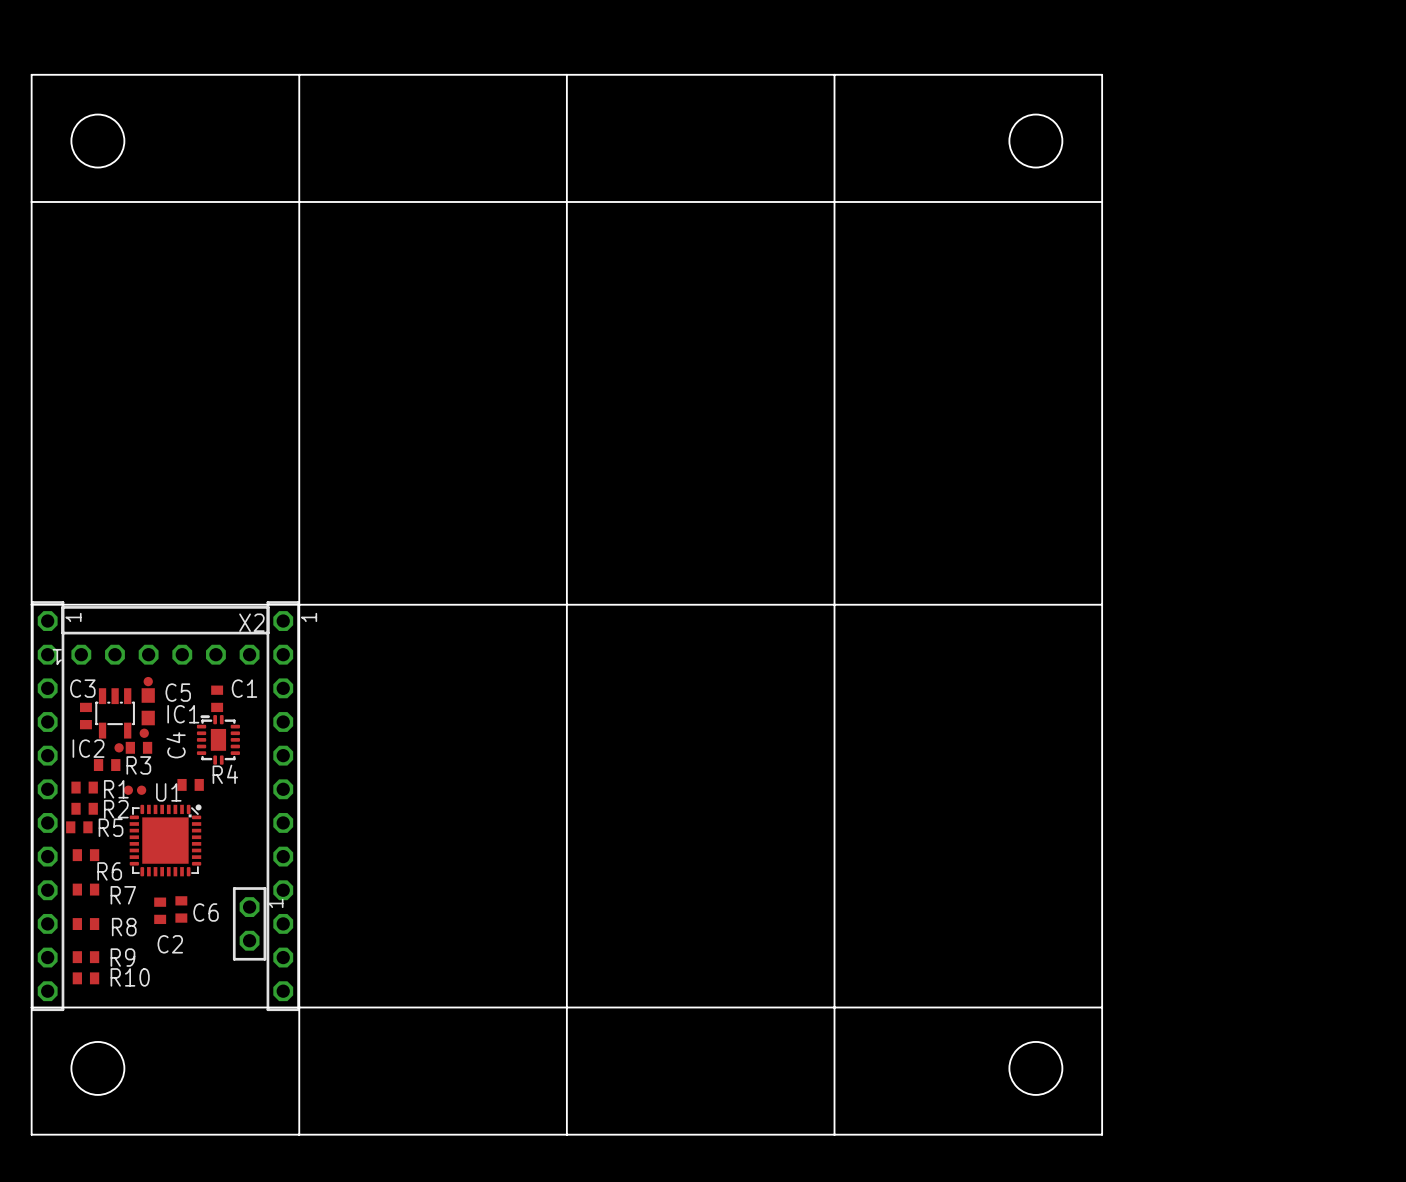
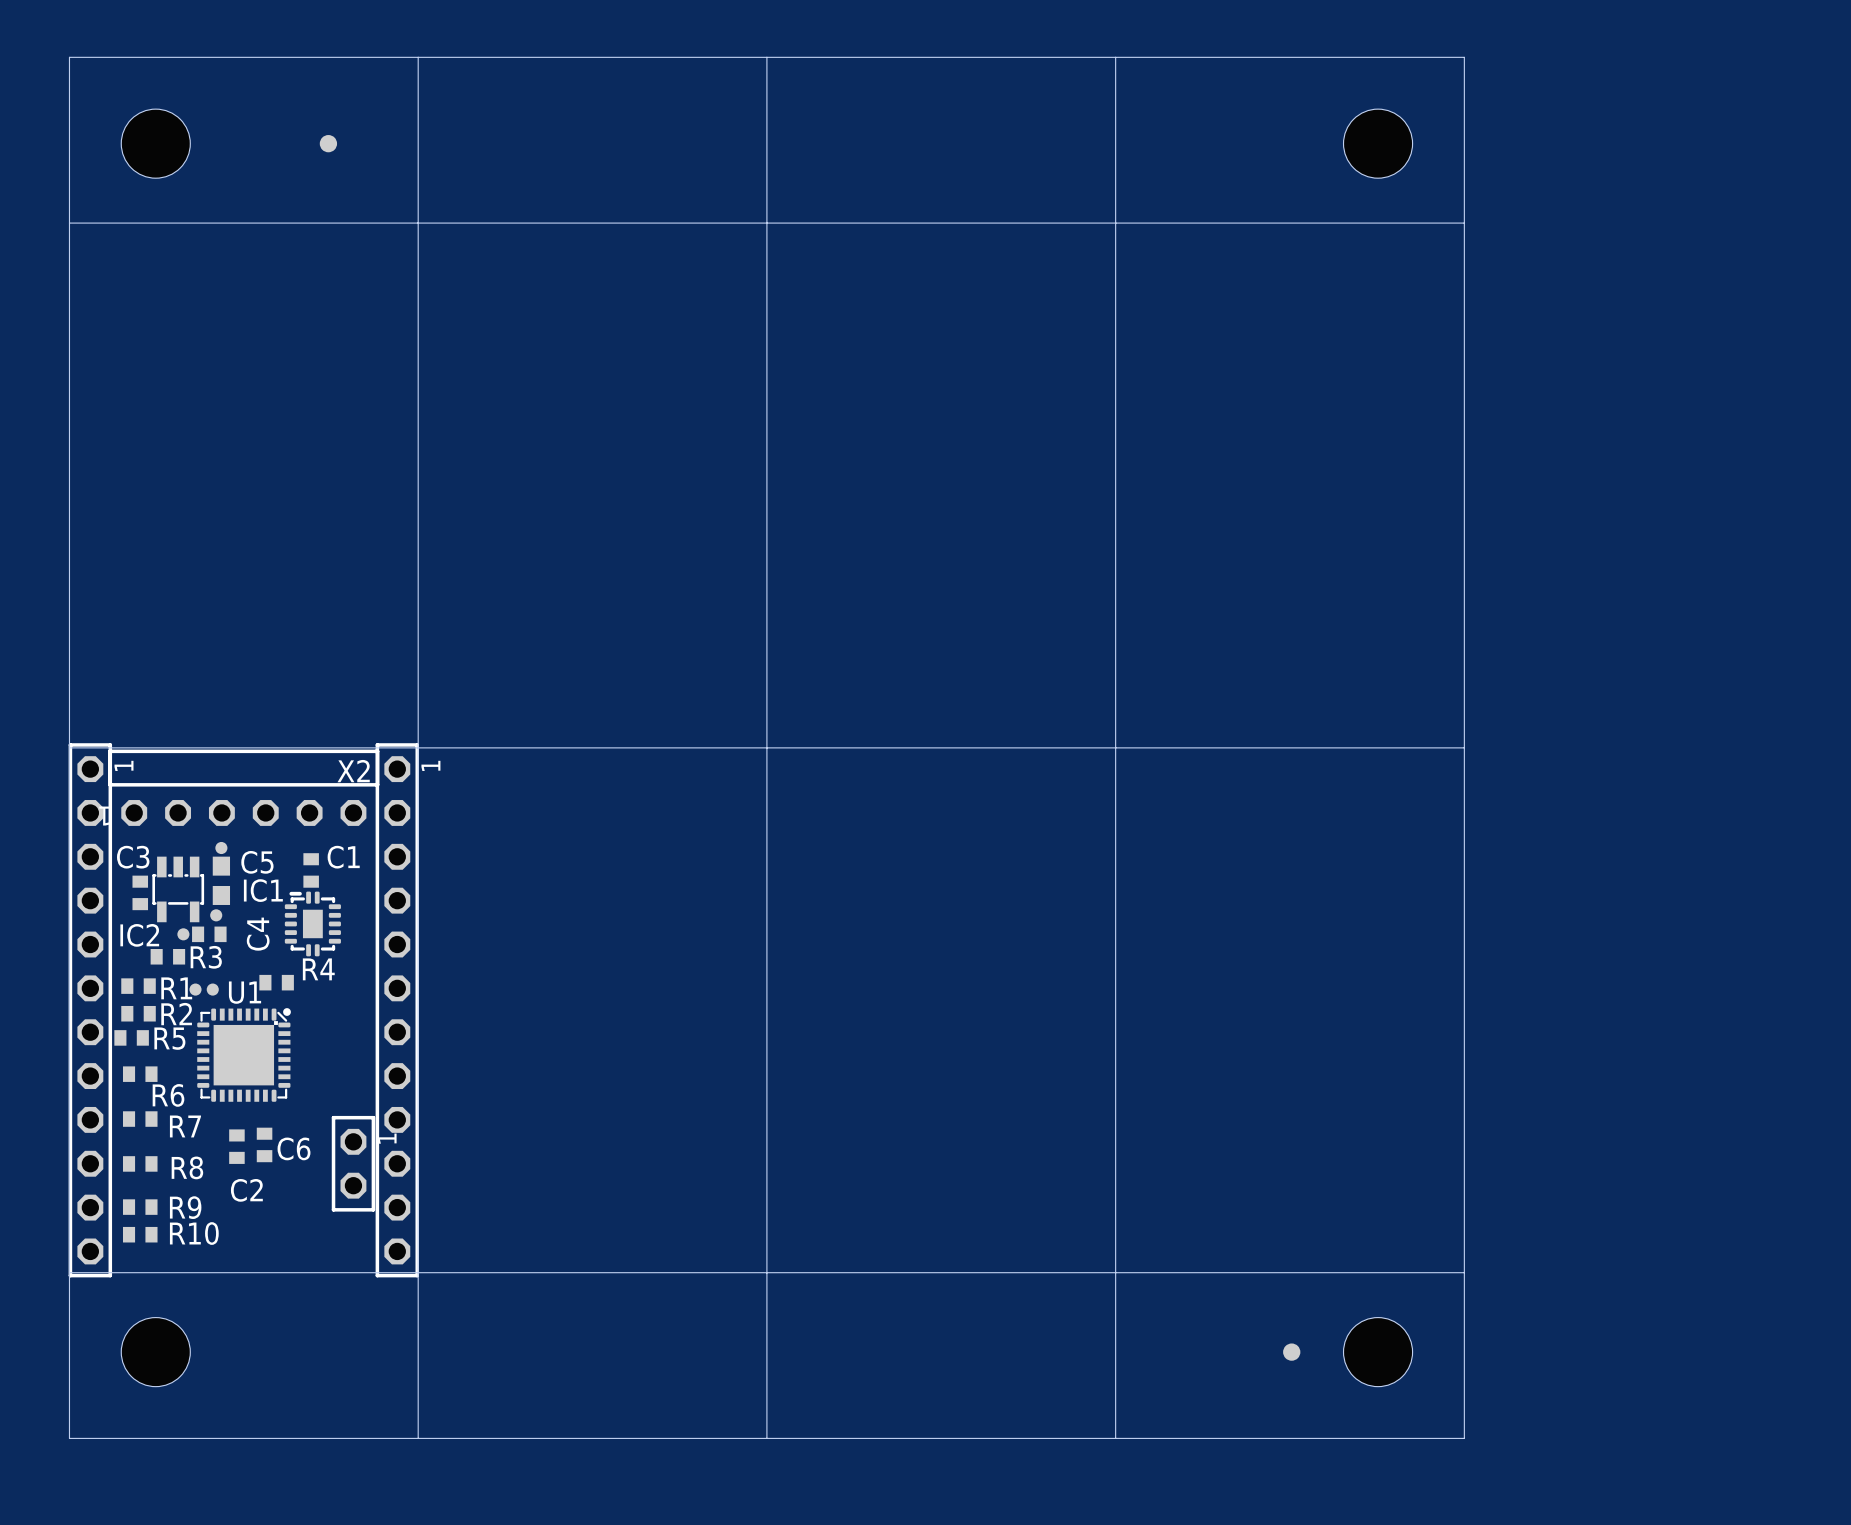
part: none -> (328, 143)
part: none -> (1291, 1352)

